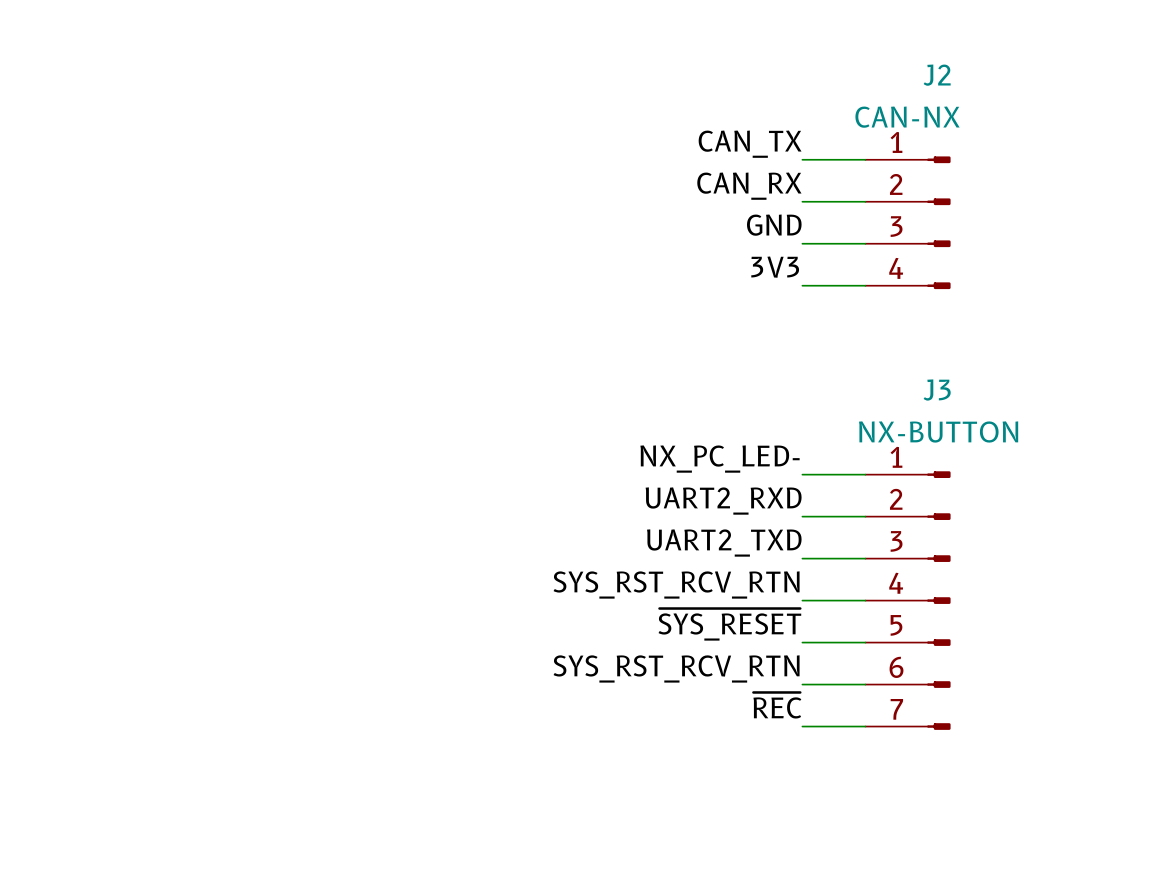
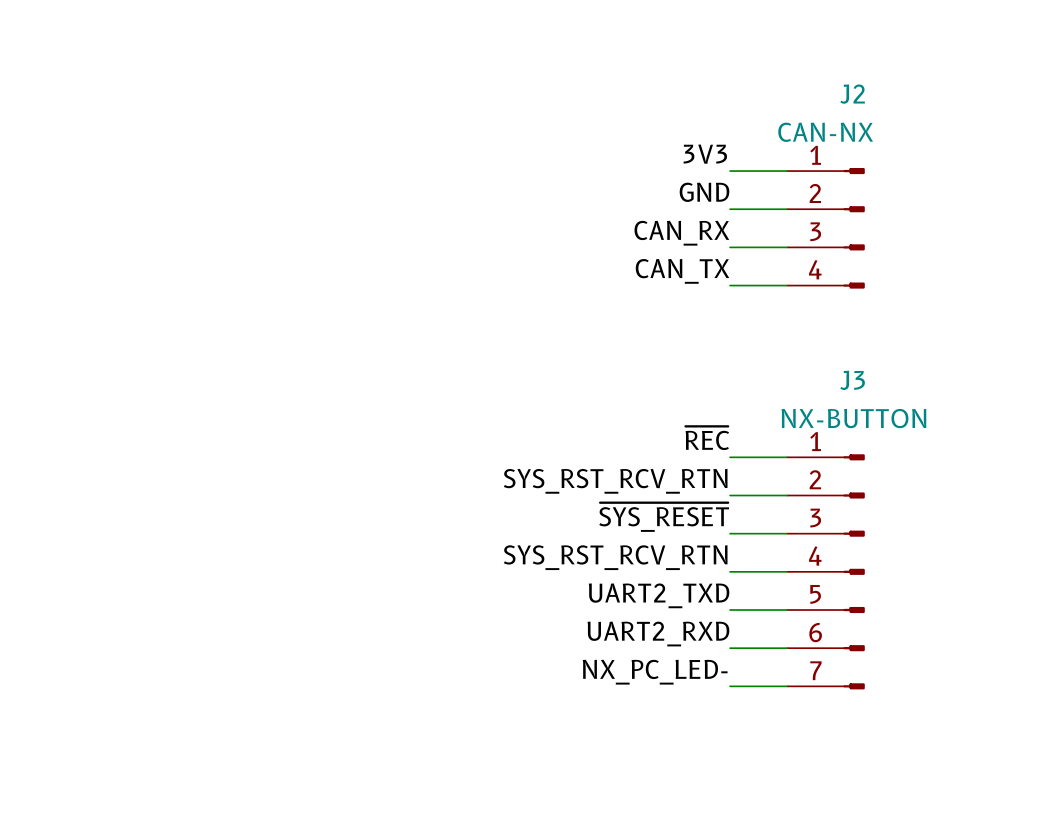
label: CAN_TX (750, 144) -> 3V3 (705, 154)
label: CAN_RX (749, 186) -> GND (704, 192)
label: GND (774, 225) -> CAN_RX (681, 233)
label: 3V3 (775, 267) -> CAN_TX (682, 271)
label: NX_PC_LED- (720, 459) -> ~{REC} (707, 438)
label: UART2_RXD (723, 501) -> SYS_RST_RCV_RTN (615, 481)
label: UART2_TXD (724, 543) -> ~{SYS_RESET} (664, 517)
label: ~{SYS_RESET} (729, 624) -> UART2_TXD (659, 595)
label: SYS_RST_RCV_RTN (676, 668) -> UART2_RXD (658, 634)
label: ~{REC} (777, 705) -> NX_PC_LED- (655, 672)

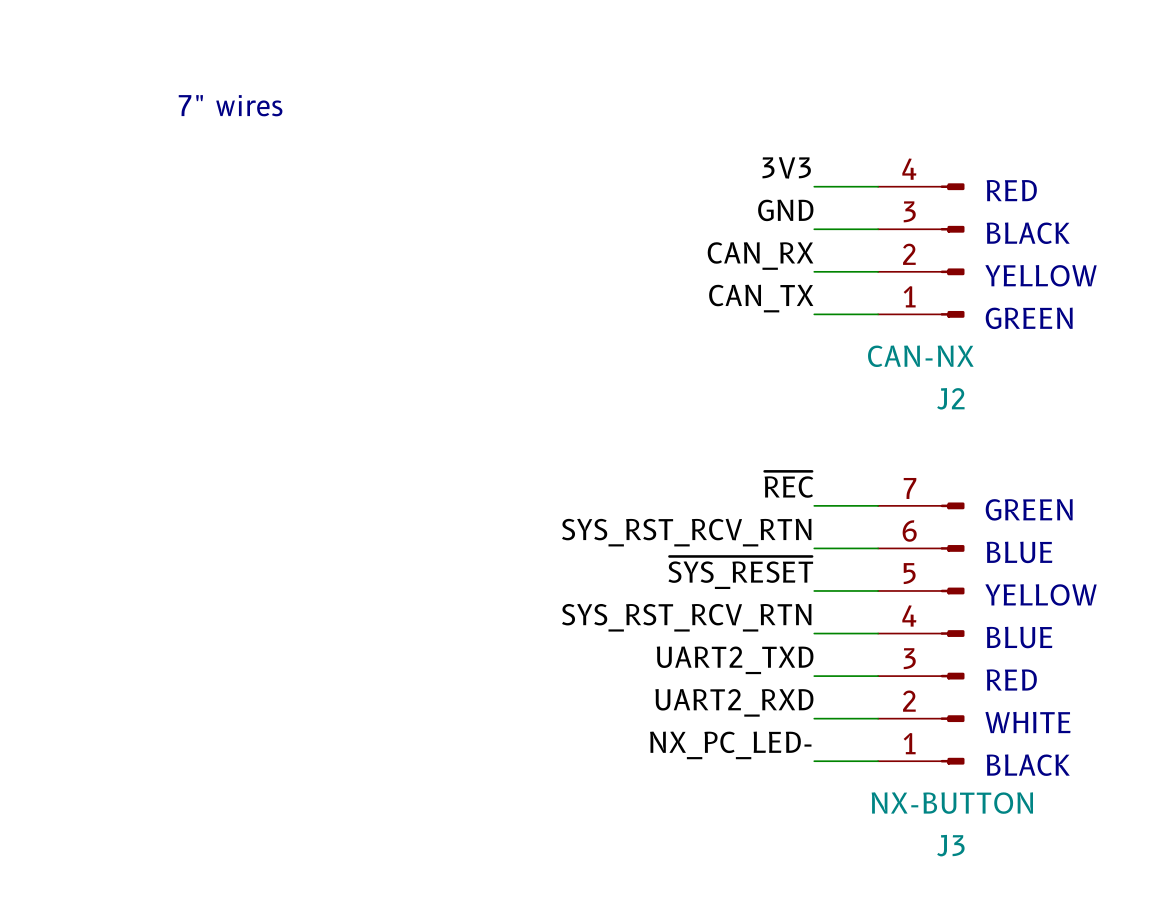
text: none -> 7" wires (230, 105)
text: none -> RED (1011, 190)
text: none -> BLACK (1028, 233)
J2 flip: as is (854, 228) -> up-down (952, 250)
text: none -> YELLOW (1041, 275)
text: none -> GREEN (1029, 318)
text: none -> GREEN (1029, 509)
text: none -> BLUE (1019, 552)
text: none -> YELLOW (1041, 594)
J3 flip: as is (854, 571) -> up-down (952, 633)
text: none -> BLUE (1019, 637)
text: none -> RED (1011, 680)
text: none -> WHITE (1027, 722)
text: none -> BLACK (1028, 765)

